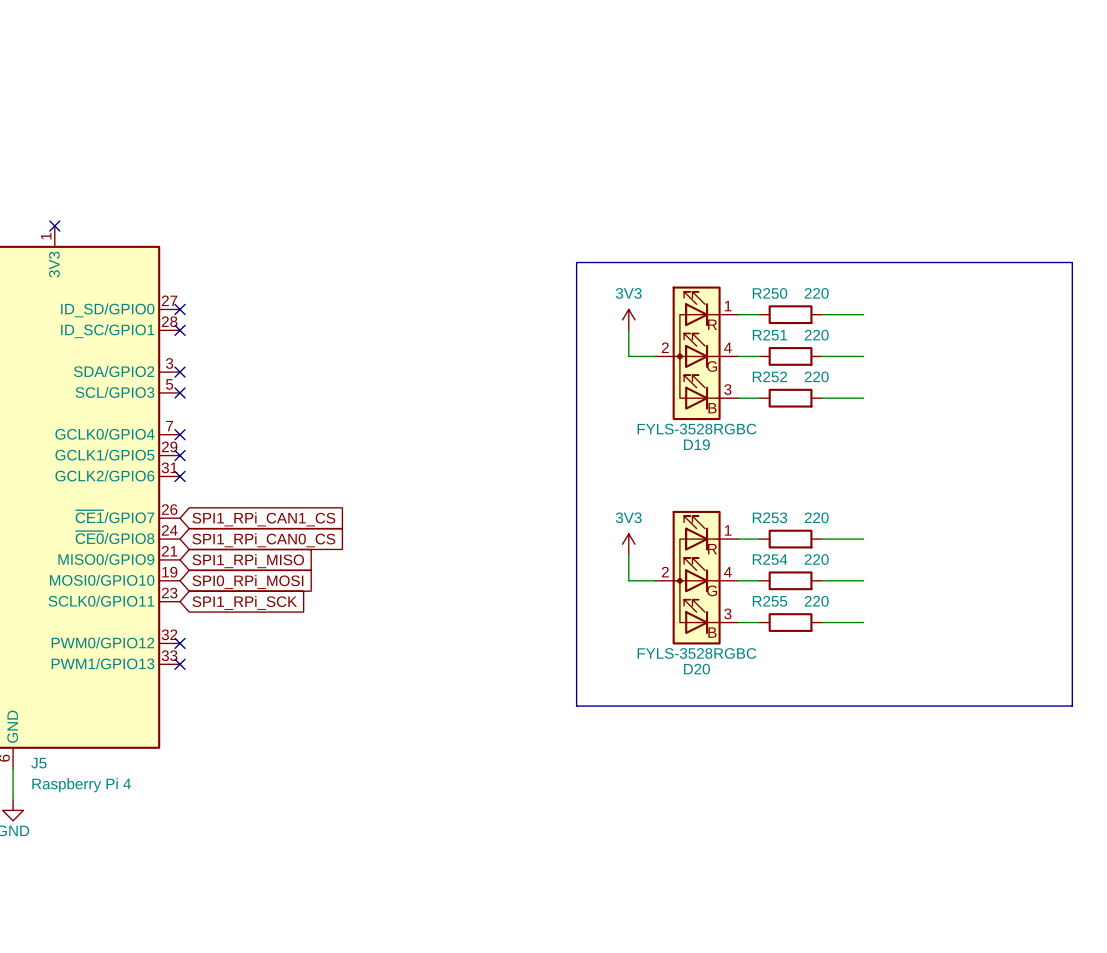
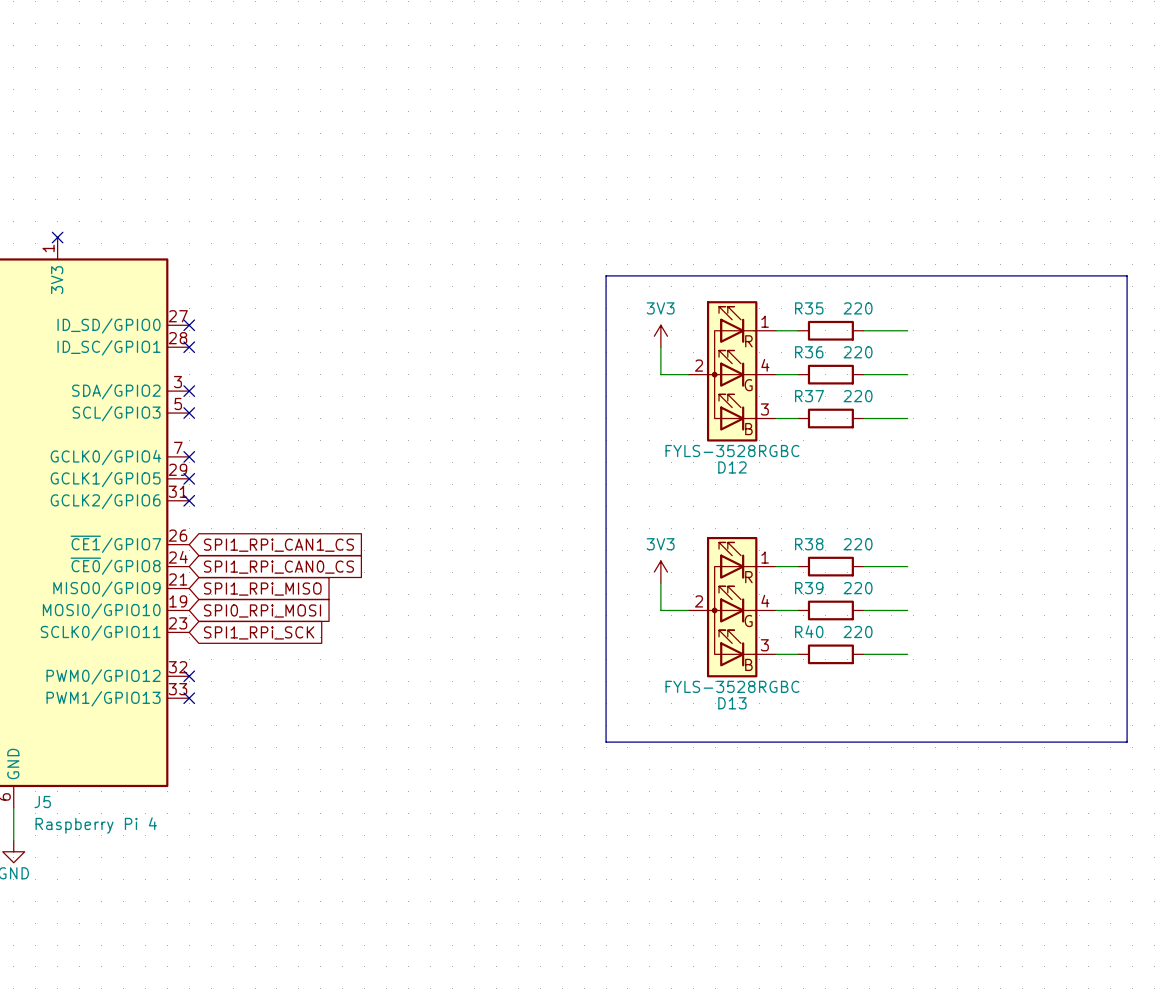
R250 name: R250 (770, 293) -> R35 (809, 308)
R251 name: R251 (769, 335) -> R36 (809, 352)
R252 name: R252 (769, 376) -> R37 (809, 396)
D19 name: D19 (696, 444) -> D12 (732, 467)
R253 name: R253 (769, 517) -> R38 (809, 544)
R254 name: R254 (770, 559) -> R39 (809, 588)
R255 name: R255 (769, 601) -> R40 (809, 631)
D20 name: D20 (696, 669) -> D13 (732, 703)

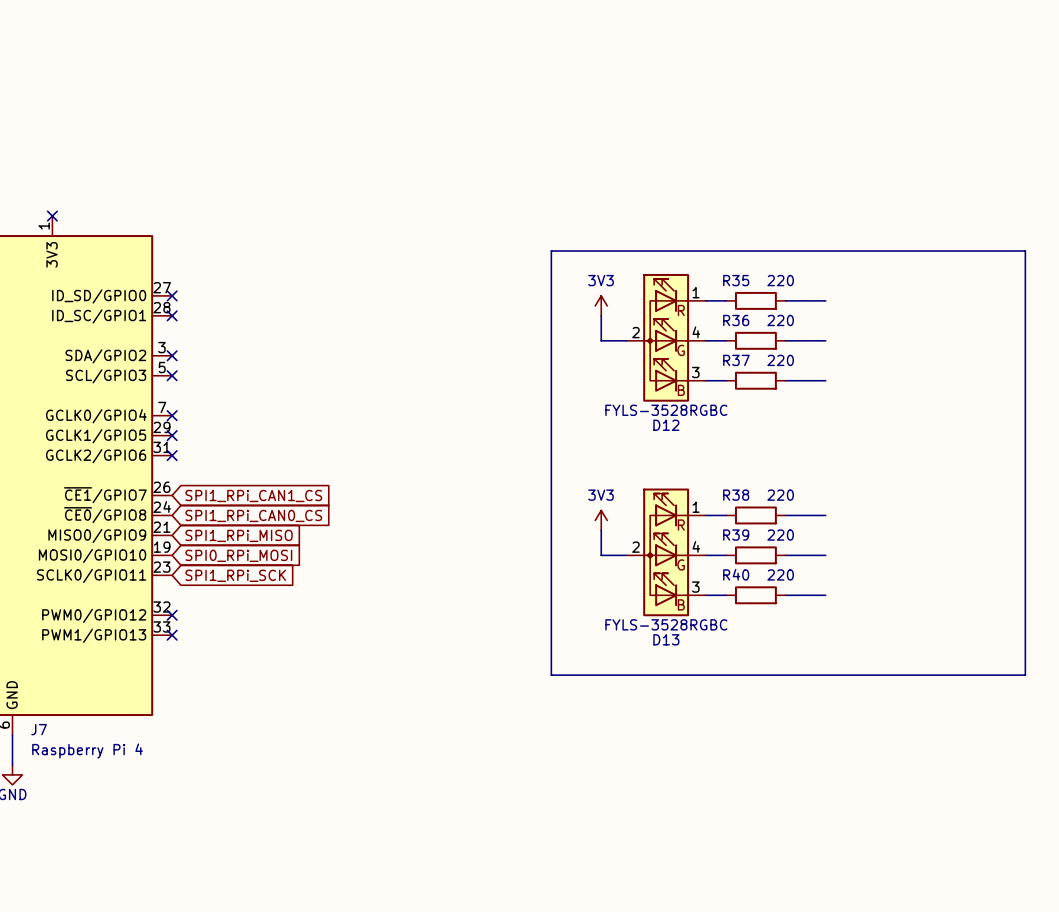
J5 name: J5 (42, 802) -> J7 (39, 729)

